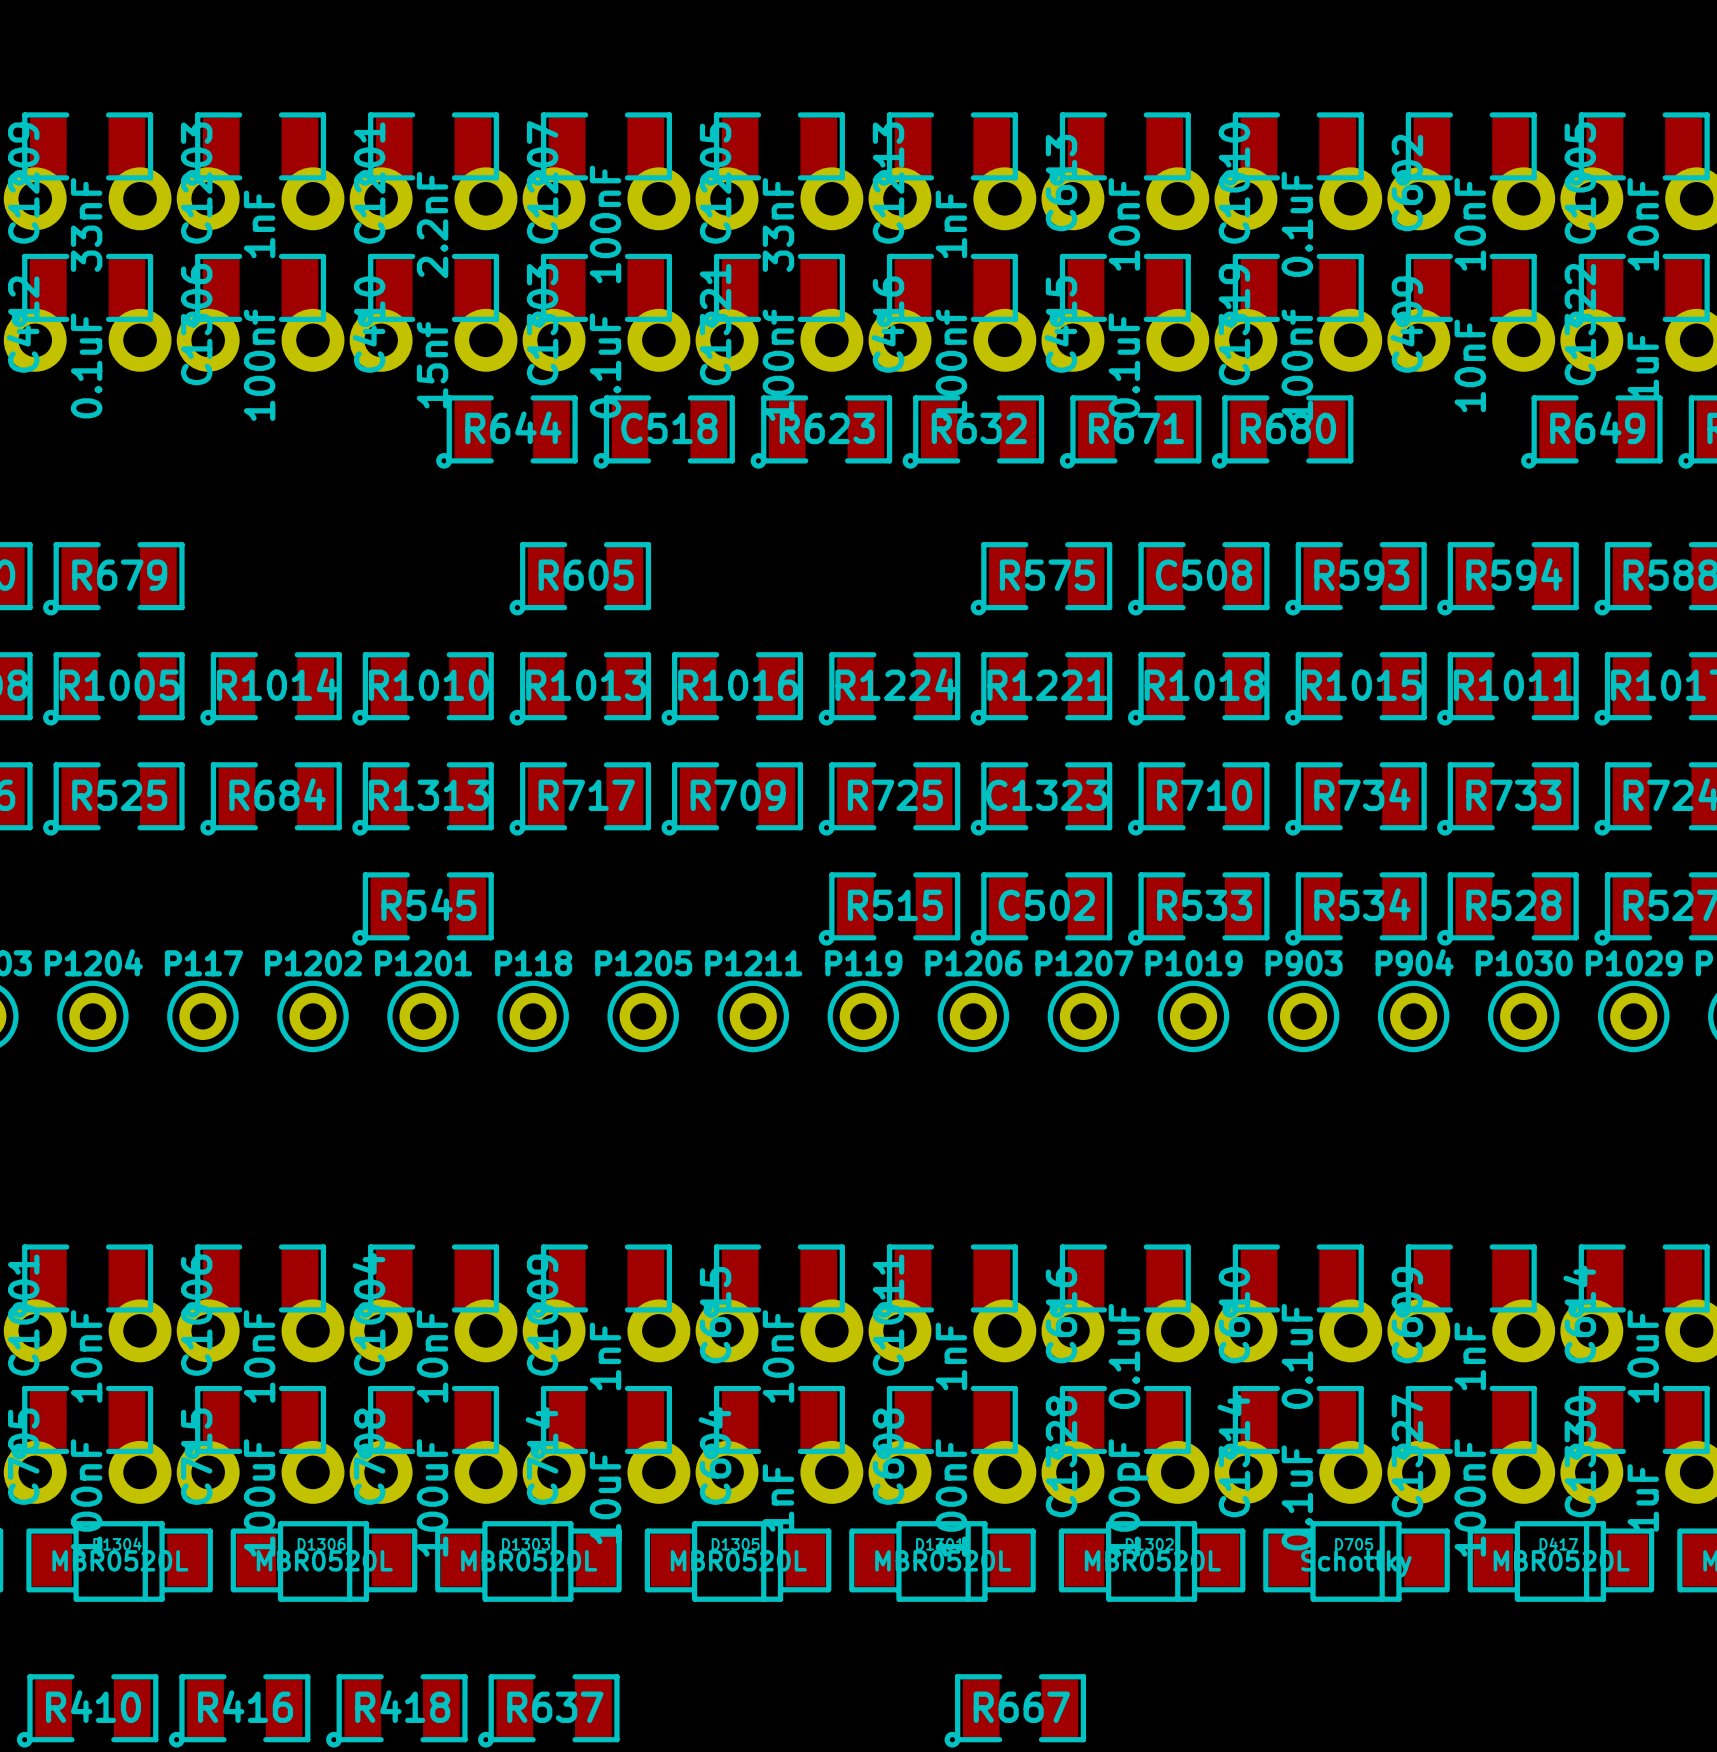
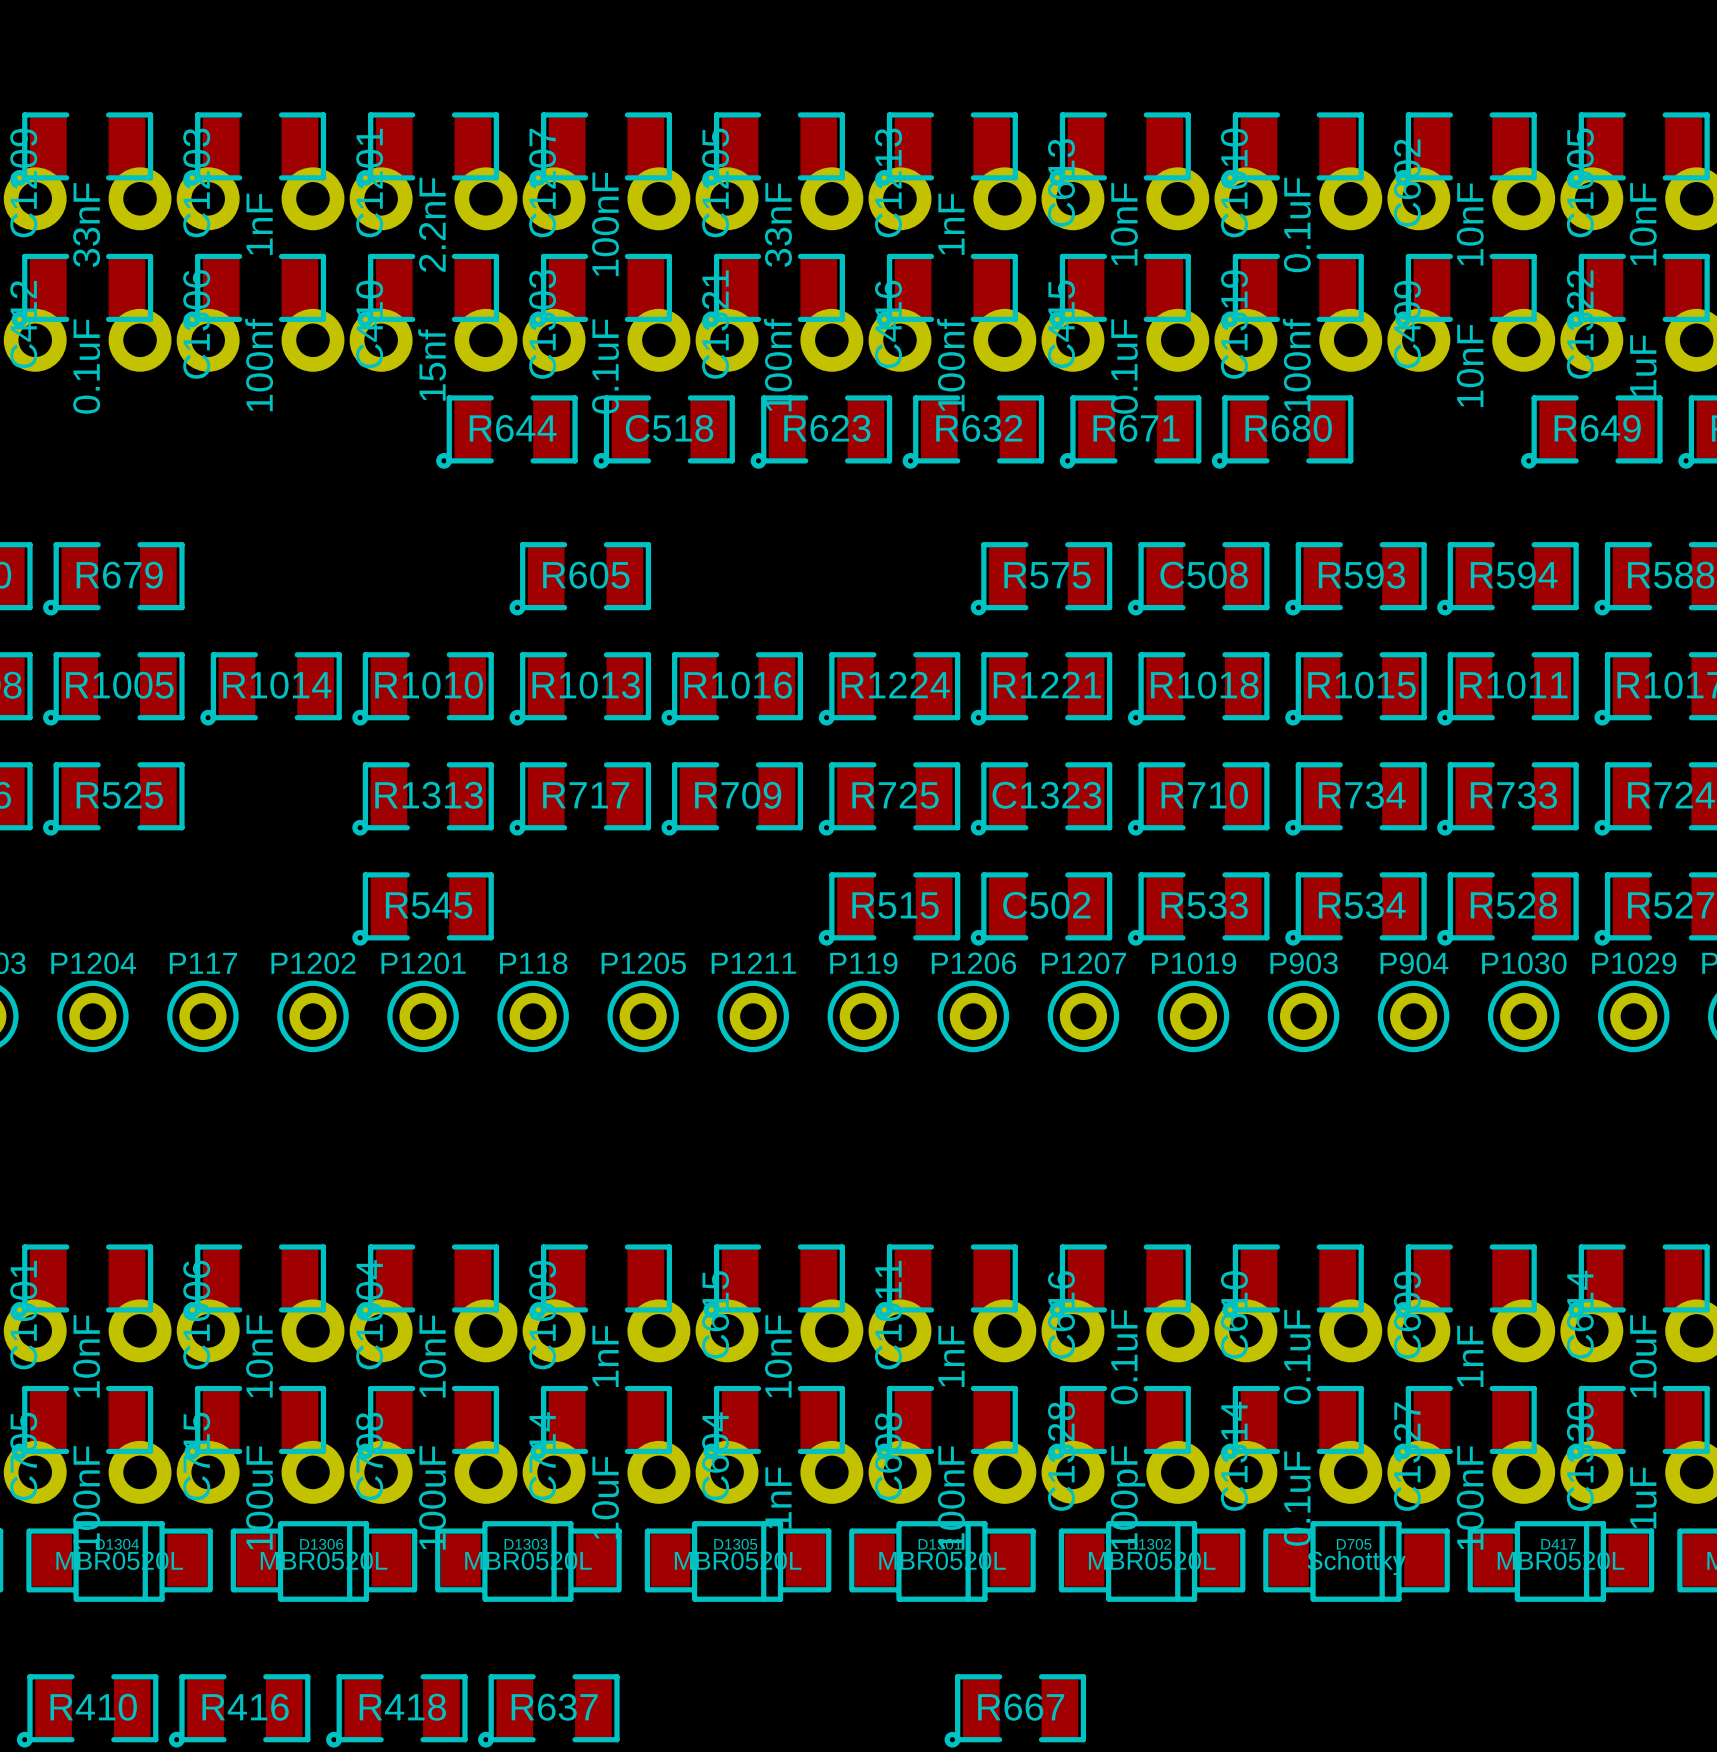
R684: (271, 798) -> none

